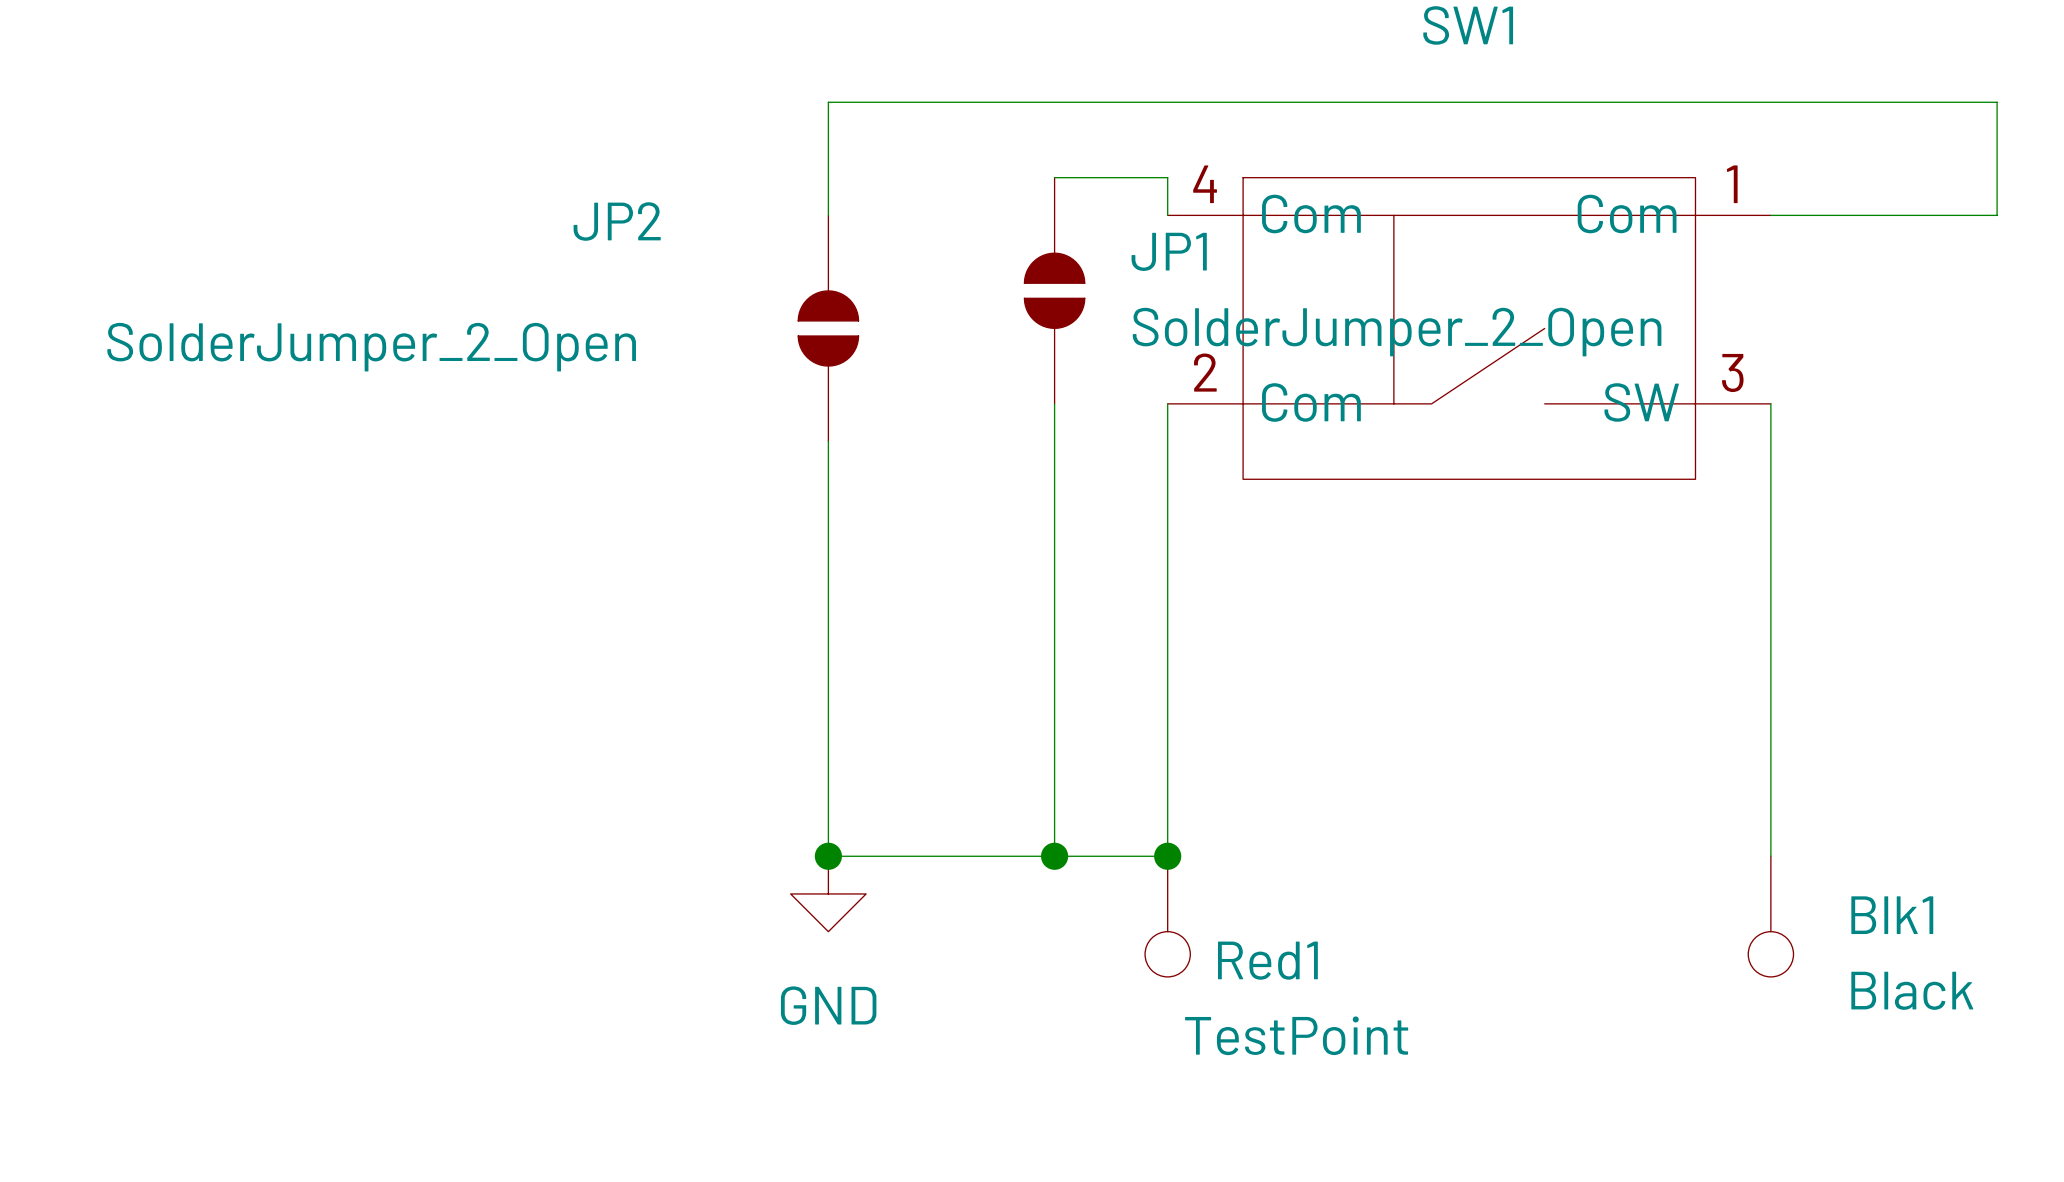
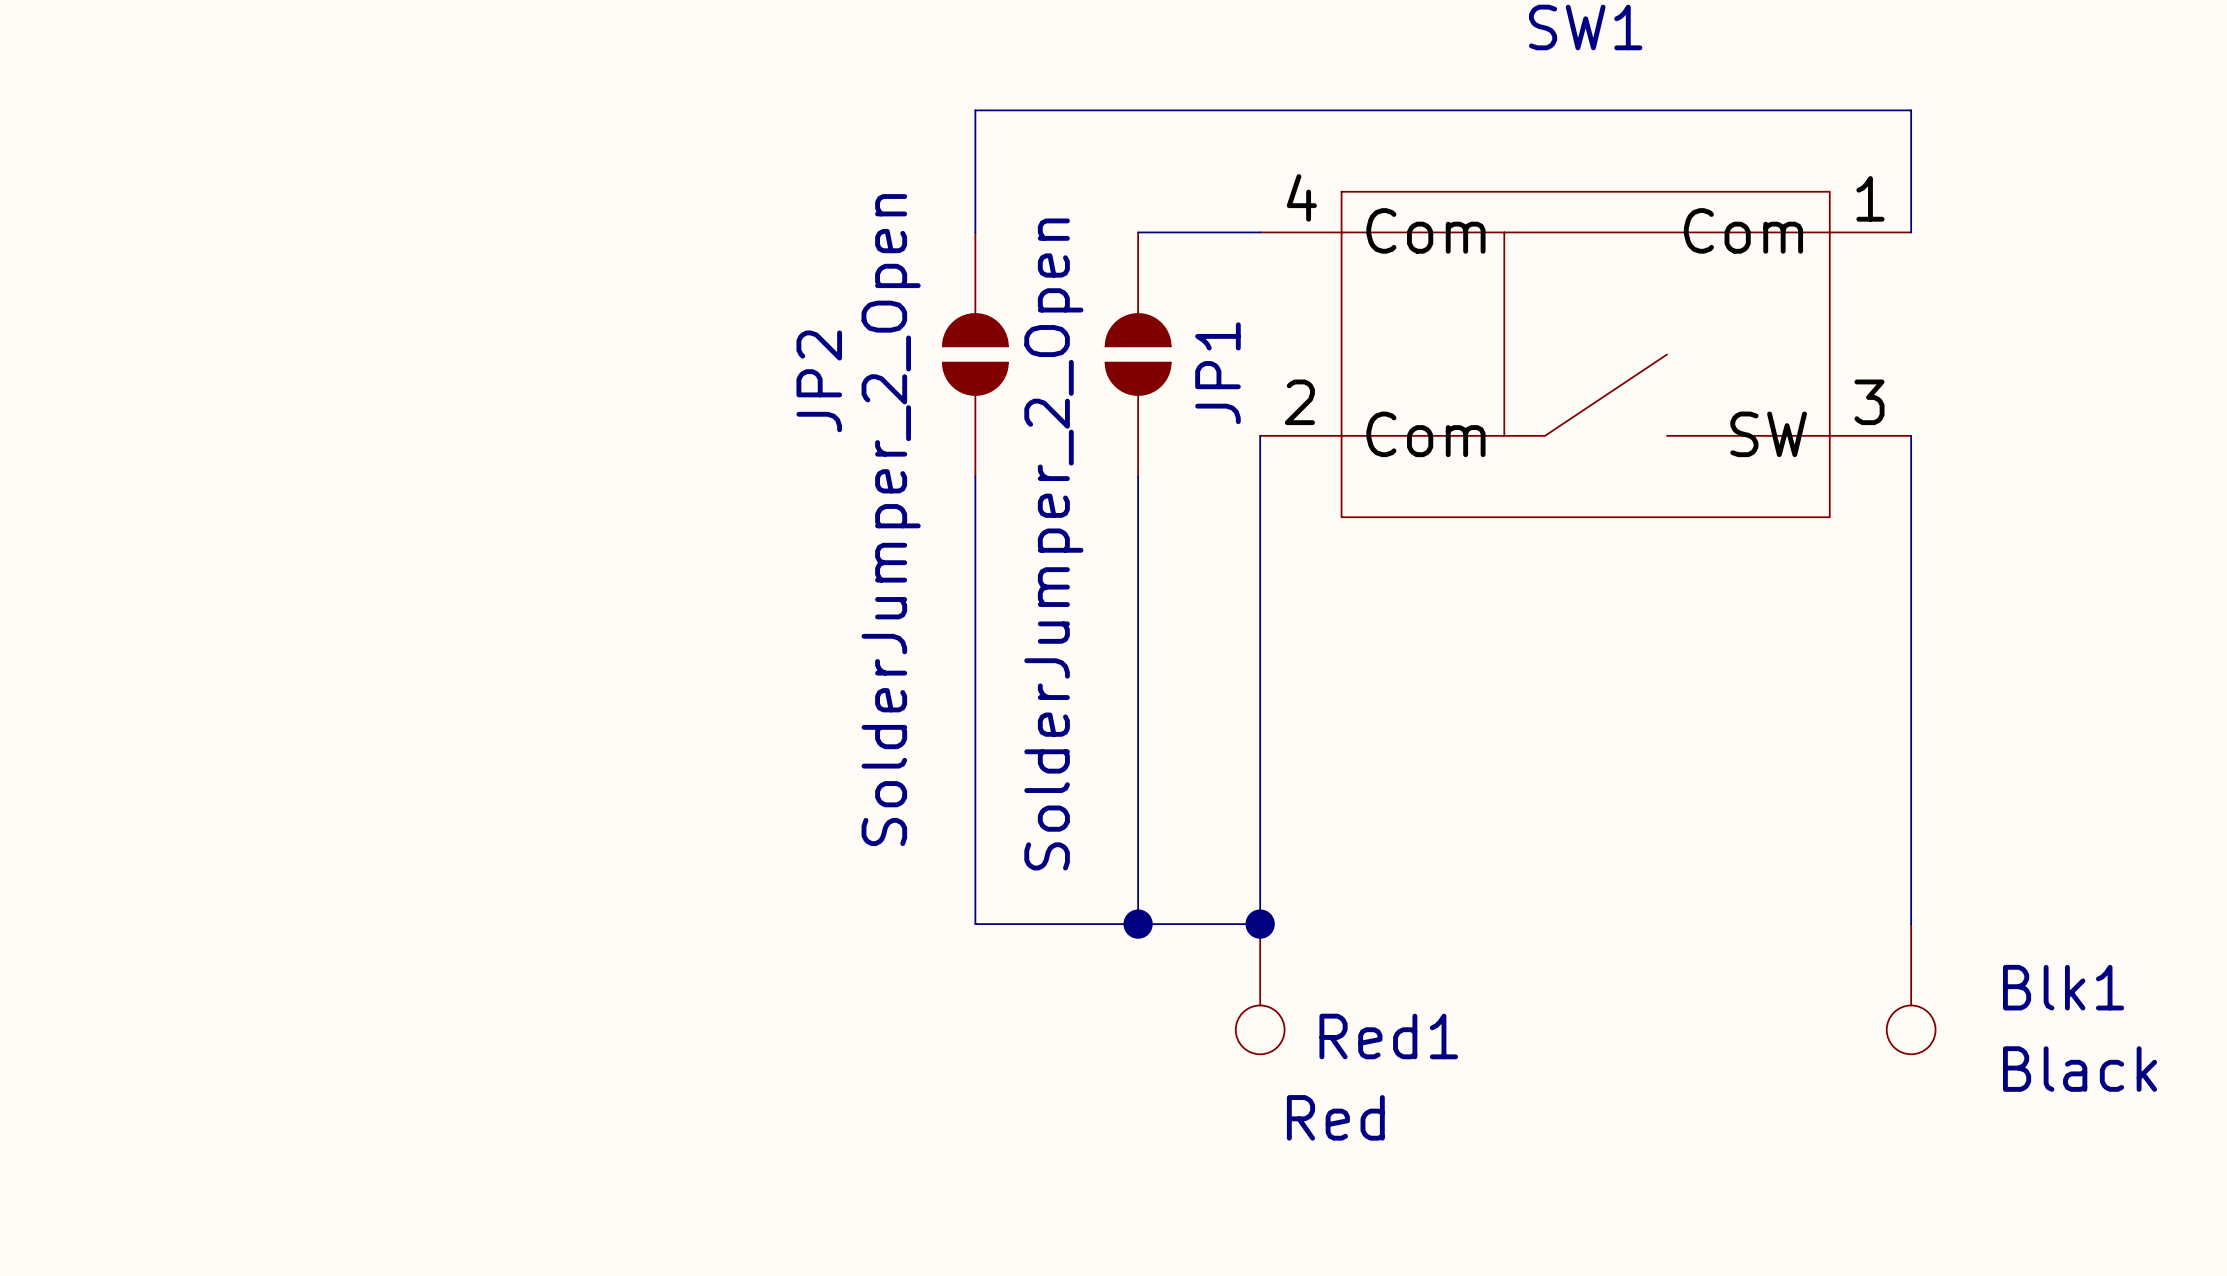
wire: (903, 102) (828, 102) (828, 215) -> (975, 110) (975, 232)
wire: (1770, 102) (1997, 102) (1997, 215) (1770, 215) -> (1911, 110) (1911, 232)
wire: (1054, 177) (1167, 177) (1167, 215) -> (1138, 232) (1260, 232)
JP2 name rotation: 0° (617, 221) -> 90° counterclockwise (819, 381)
JP2 name position: JP2 (617, 221) -> JP2 (819, 381)
JP1 name rotation: 0° (1169, 251) -> 90° counterclockwise (1217, 373)
JP1 position: (1054, 290) -> (1138, 354)
JP2 position: (828, 328) -> (975, 354)
JP1 value rotation: 0° (1397, 332) -> 90° counterclockwise (1053, 544)
JP2 value rotation: 0° (371, 347) -> 90° counterclockwise (891, 520)
wire: (828, 441) (828, 856) (903, 856) -> (975, 476) (975, 924)
junction: (828, 856) -> none
power symbol: GND (828, 893) -> none
Red1 value: TestPoint (1296, 1035) -> Red (1335, 1117)

